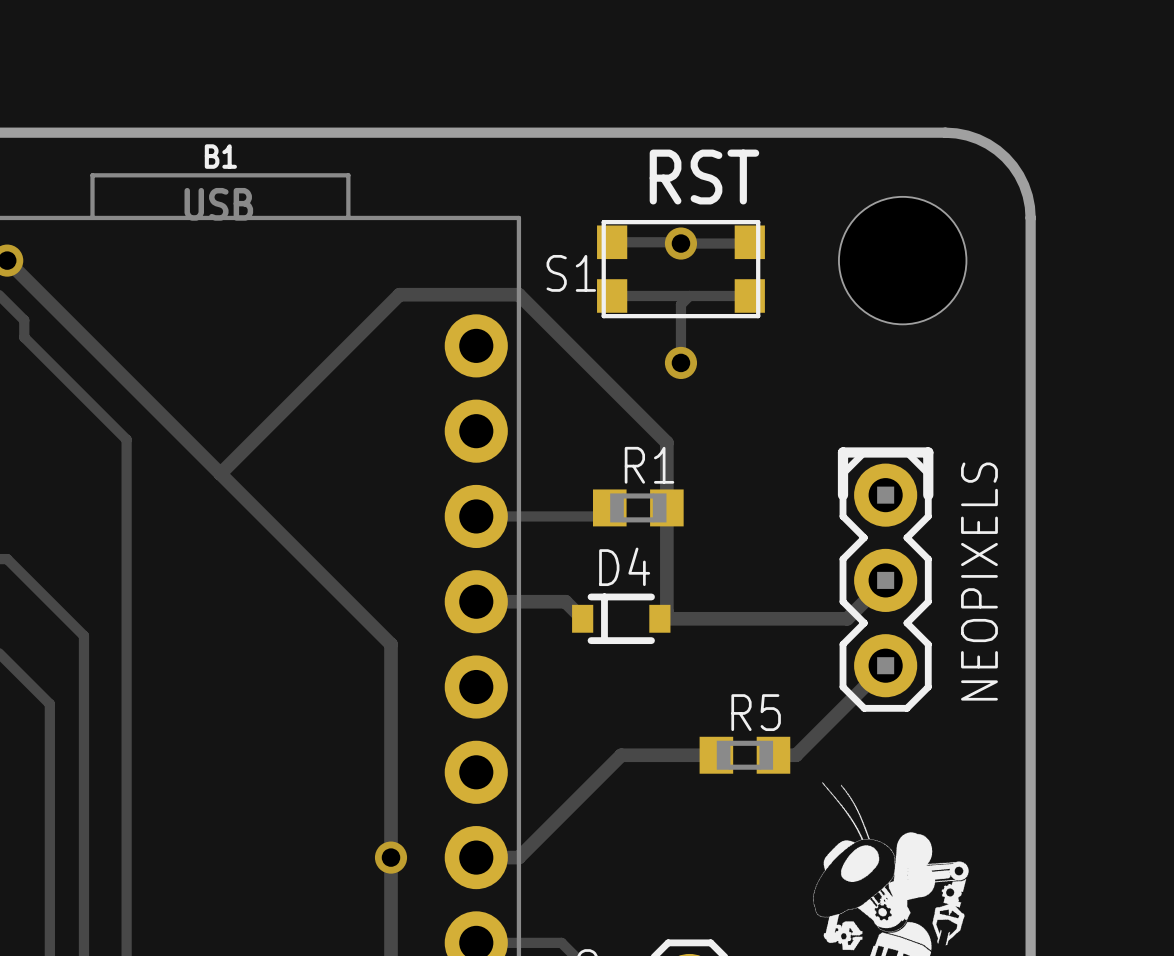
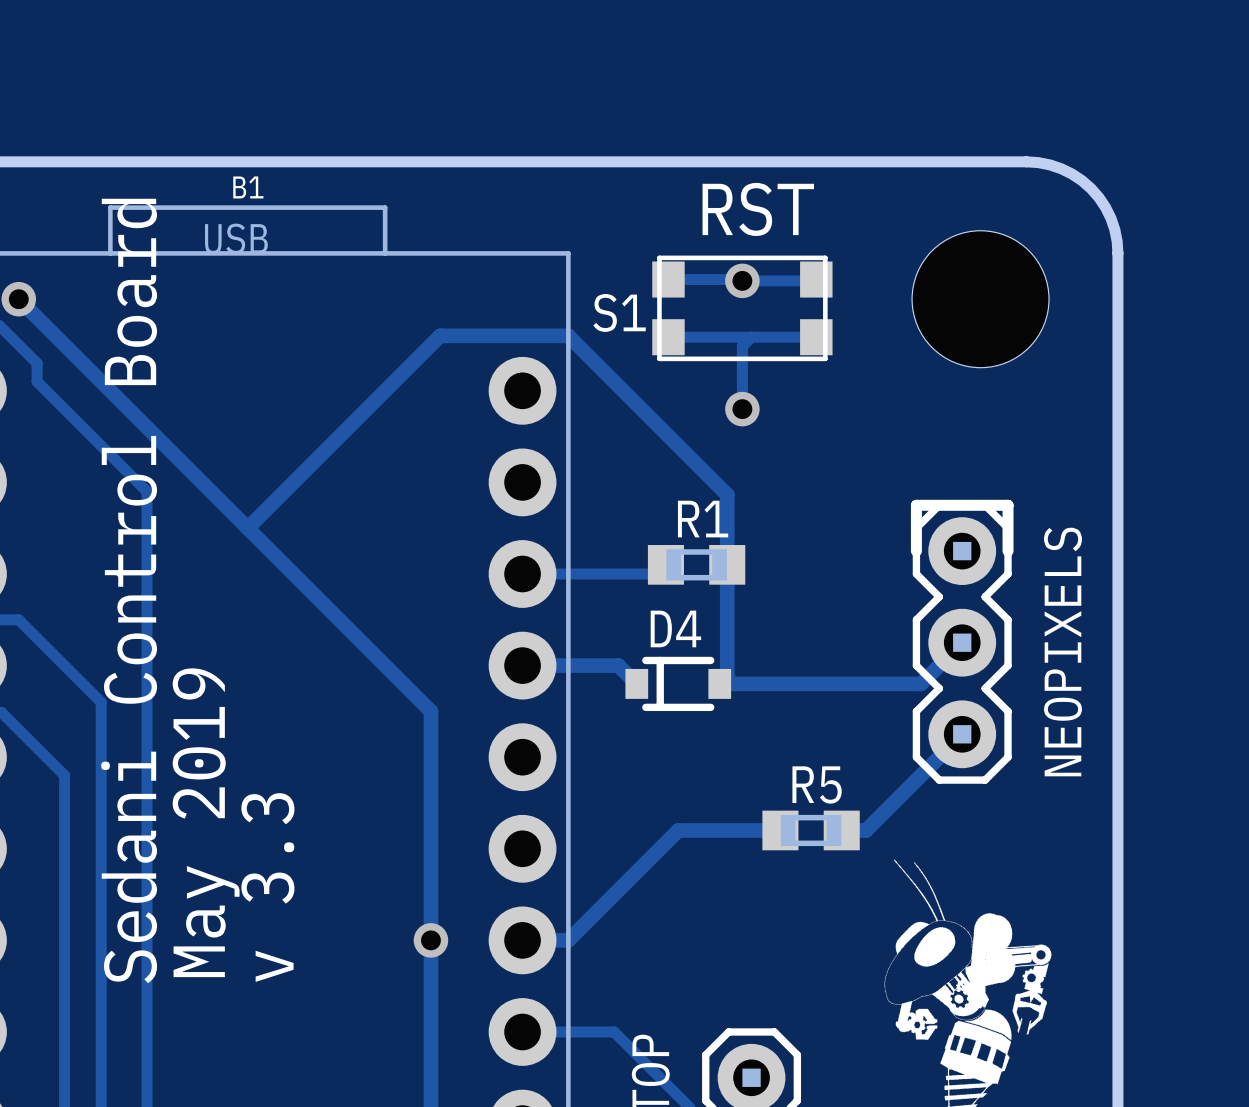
text: none -> Sedani Control Board (129, 590)
text: none -> May 2019 (206, 822)
text: none -> v 3.3 (267, 887)

